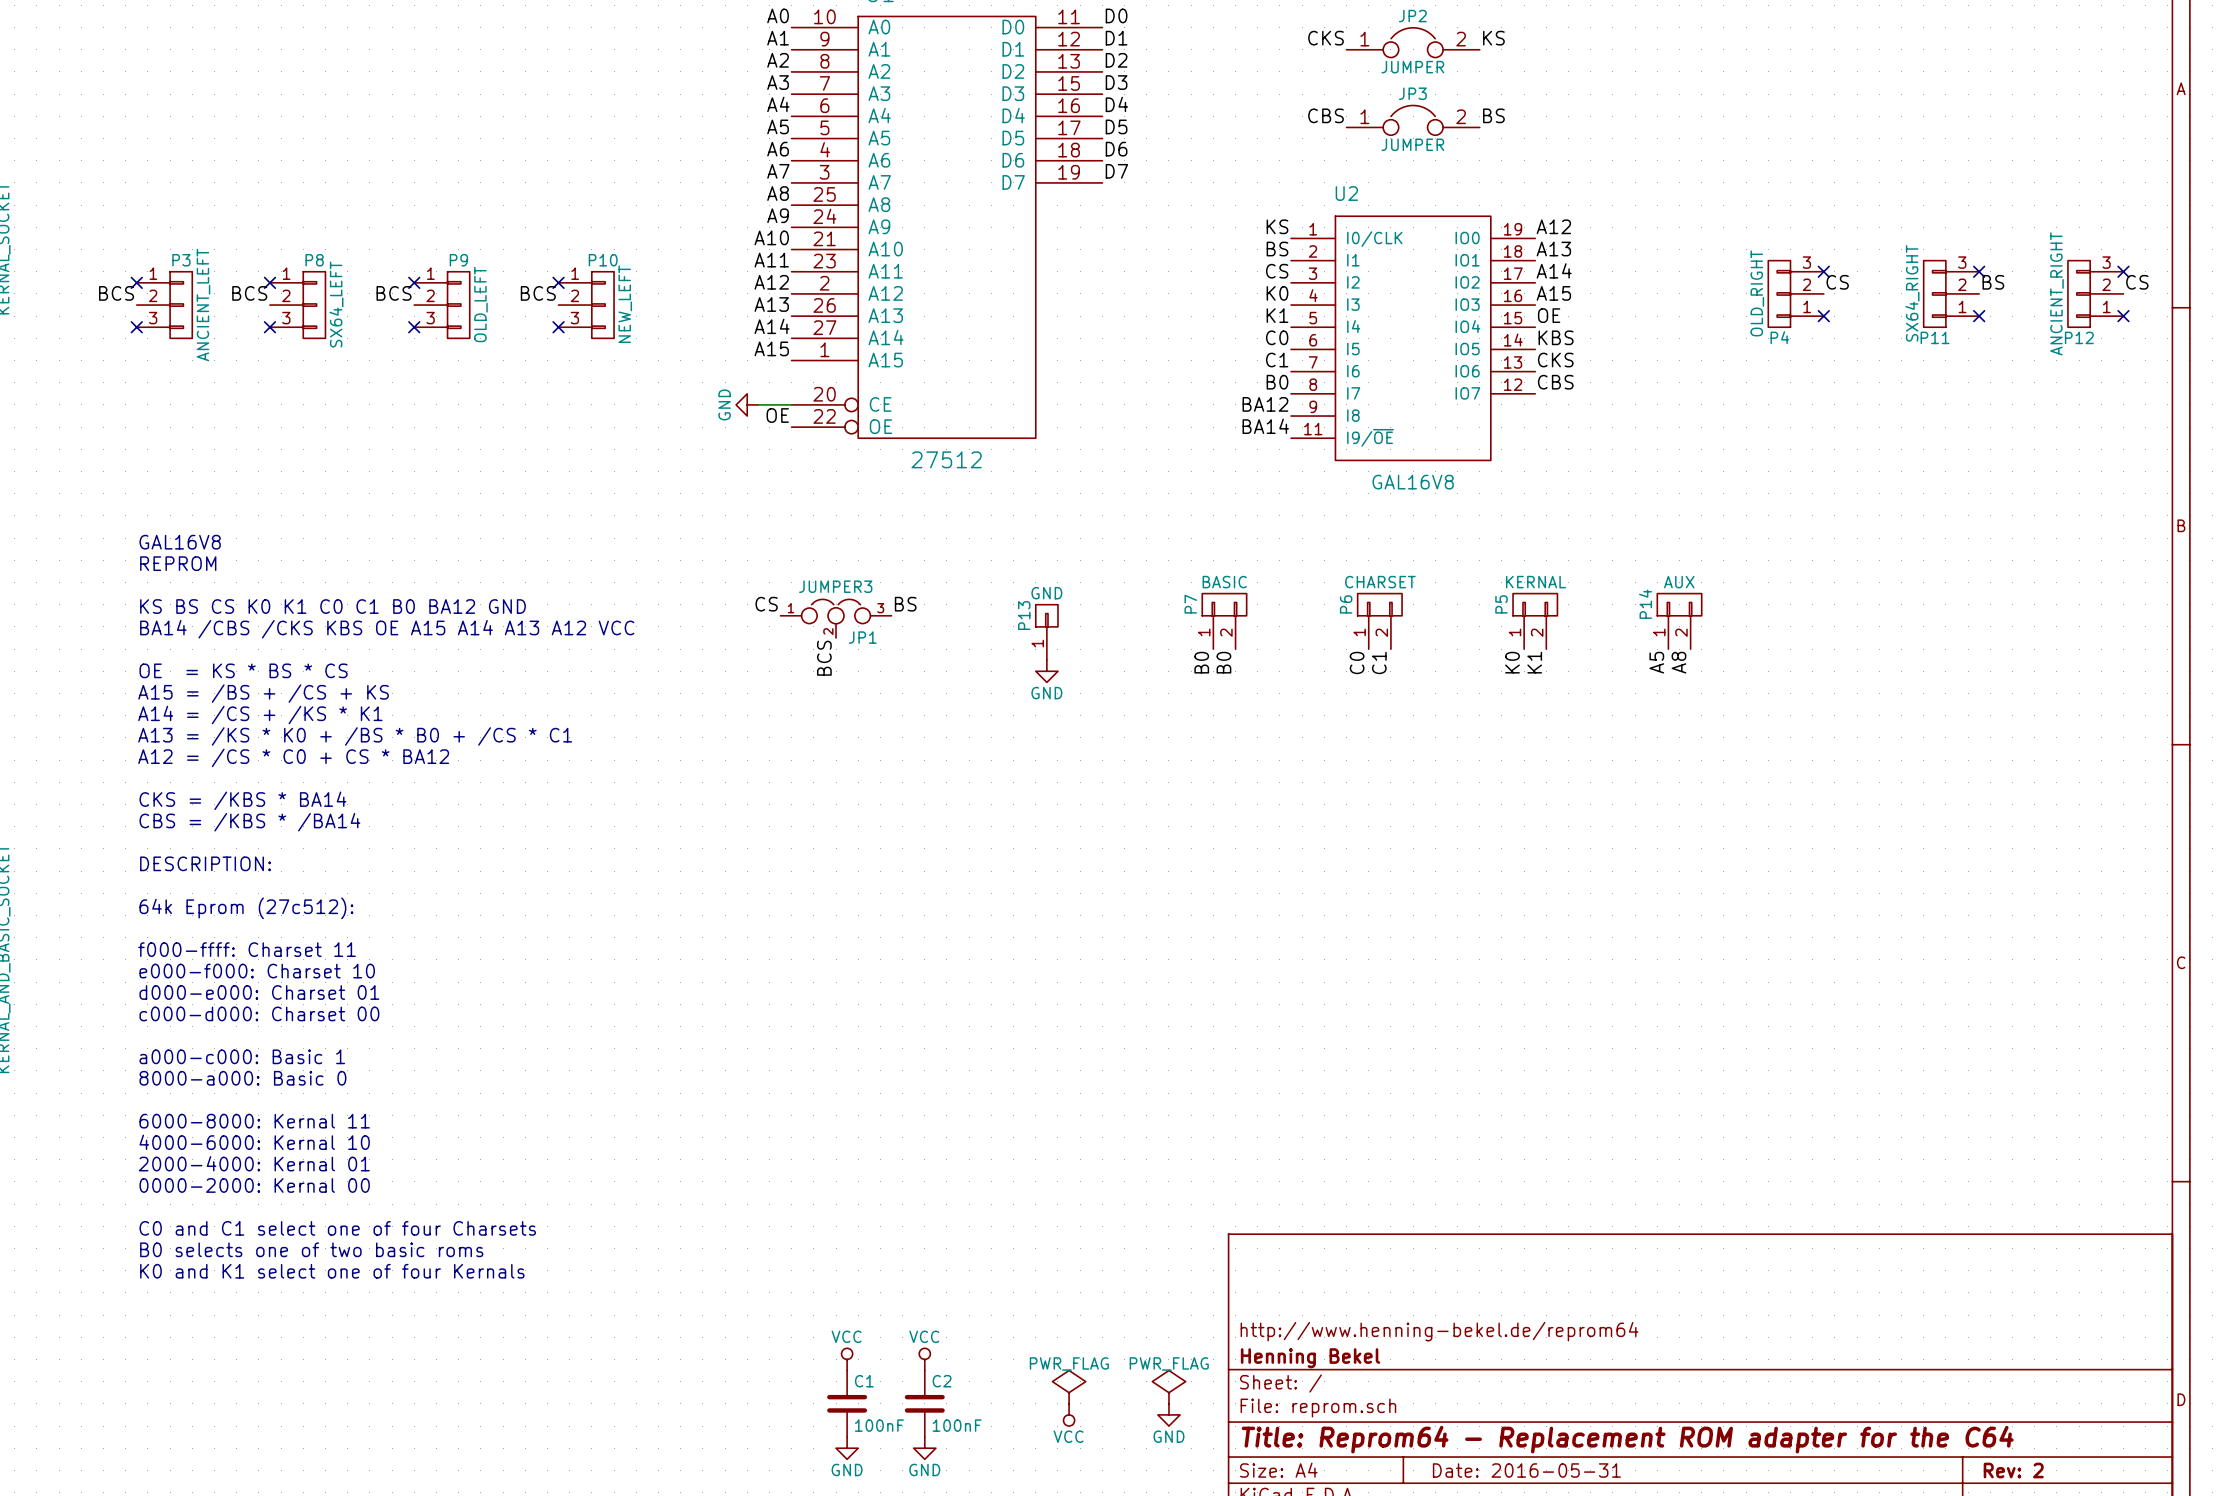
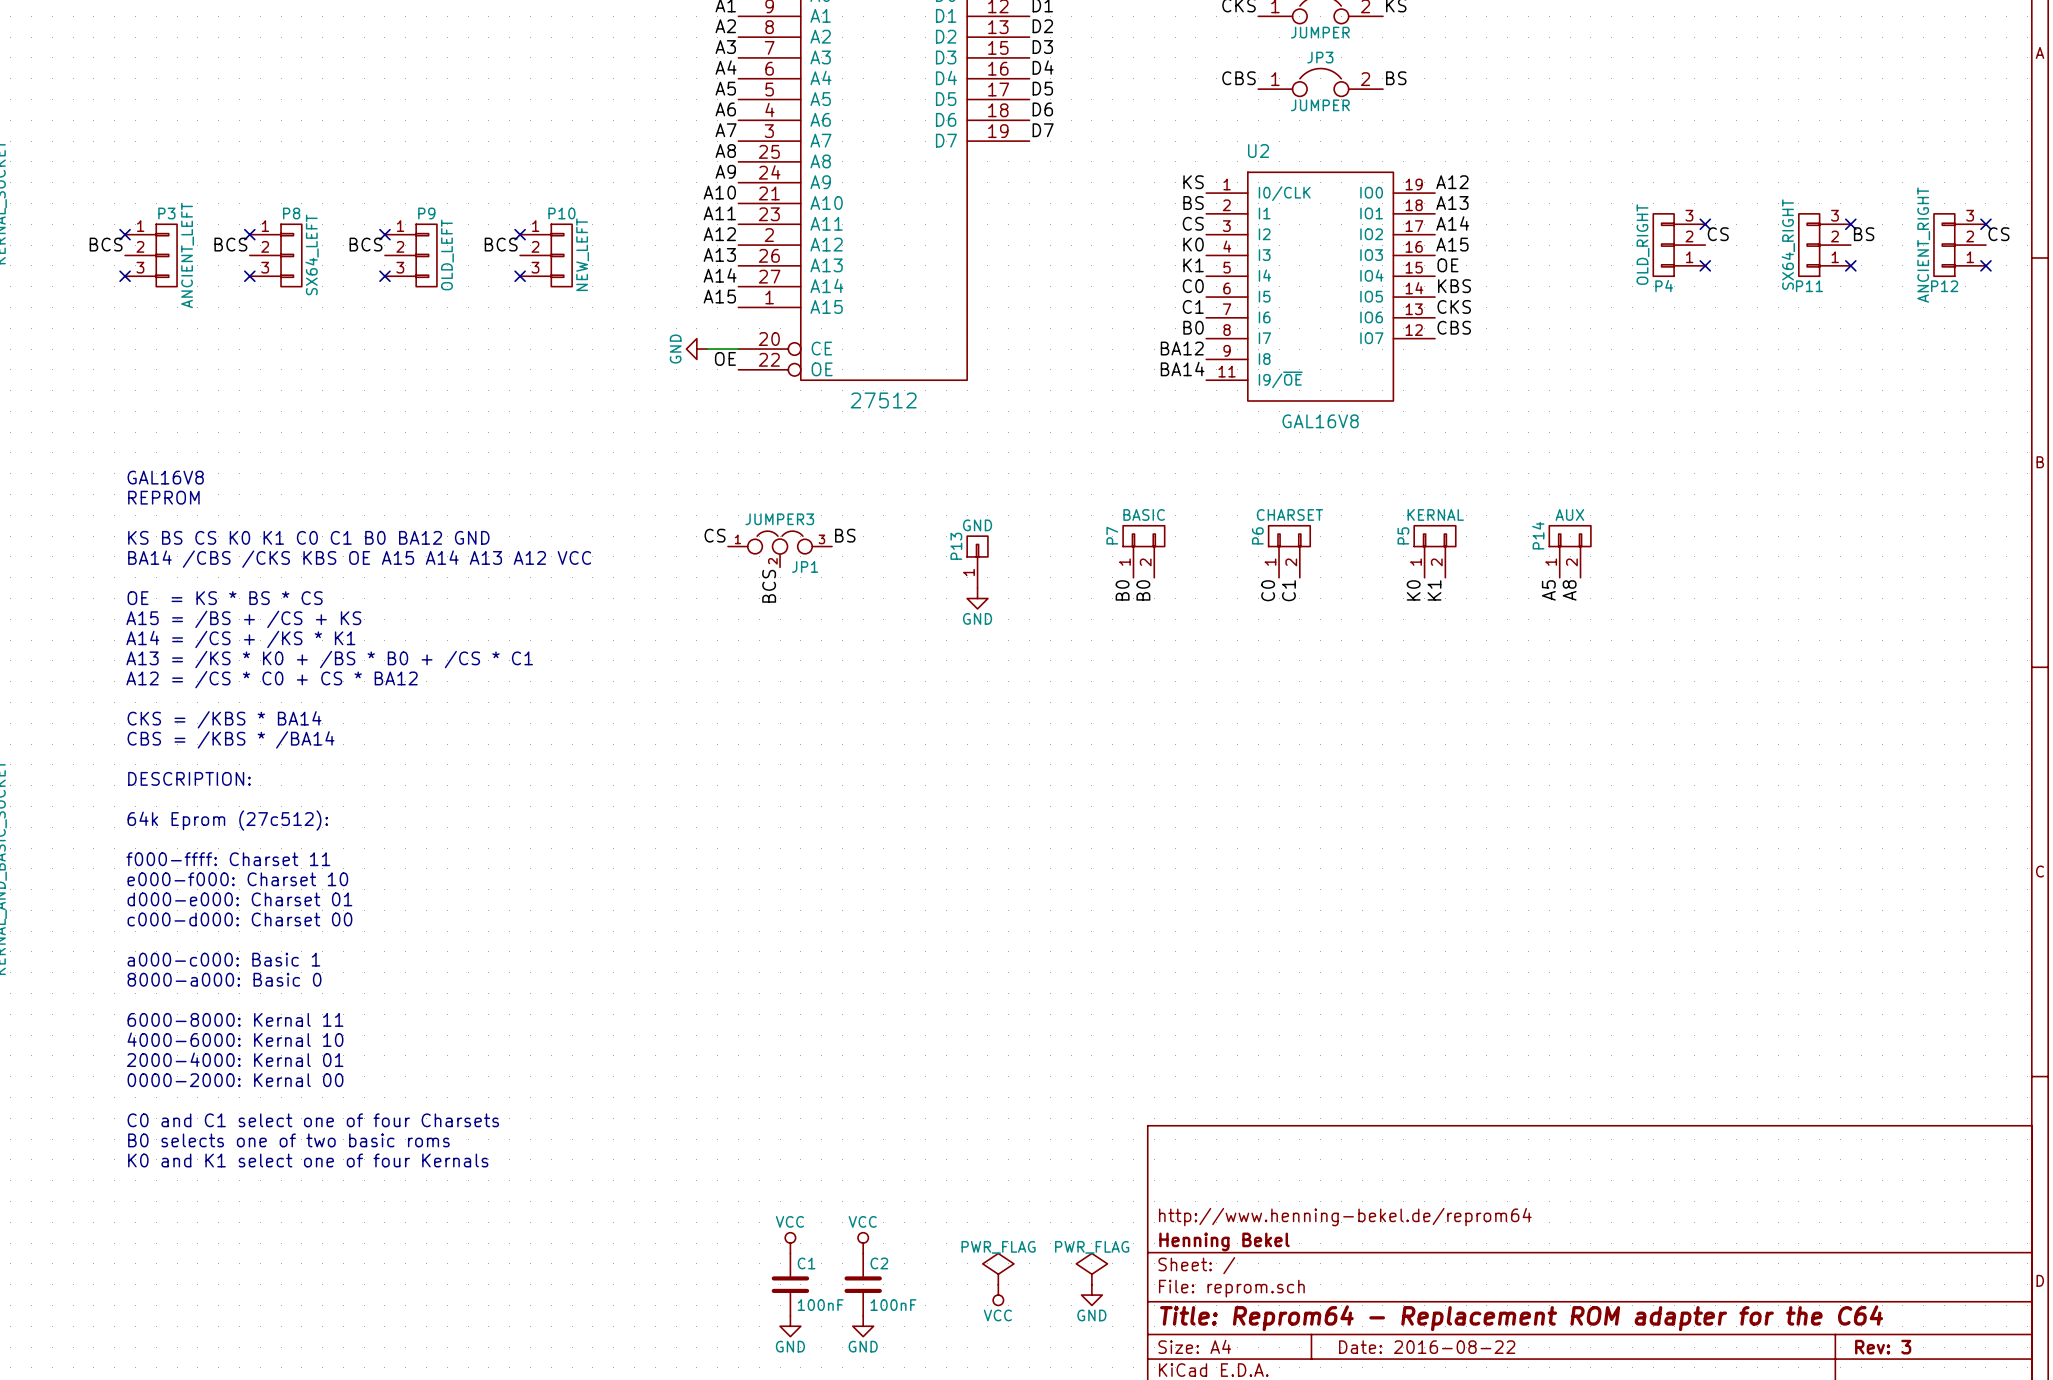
title block: Date: 2016-05-31 (1526, 1470) -> Date: 2016-08-22 (1427, 1347)
title block: Rev: 2 (2013, 1470) -> Rev: 3 (1883, 1347)

